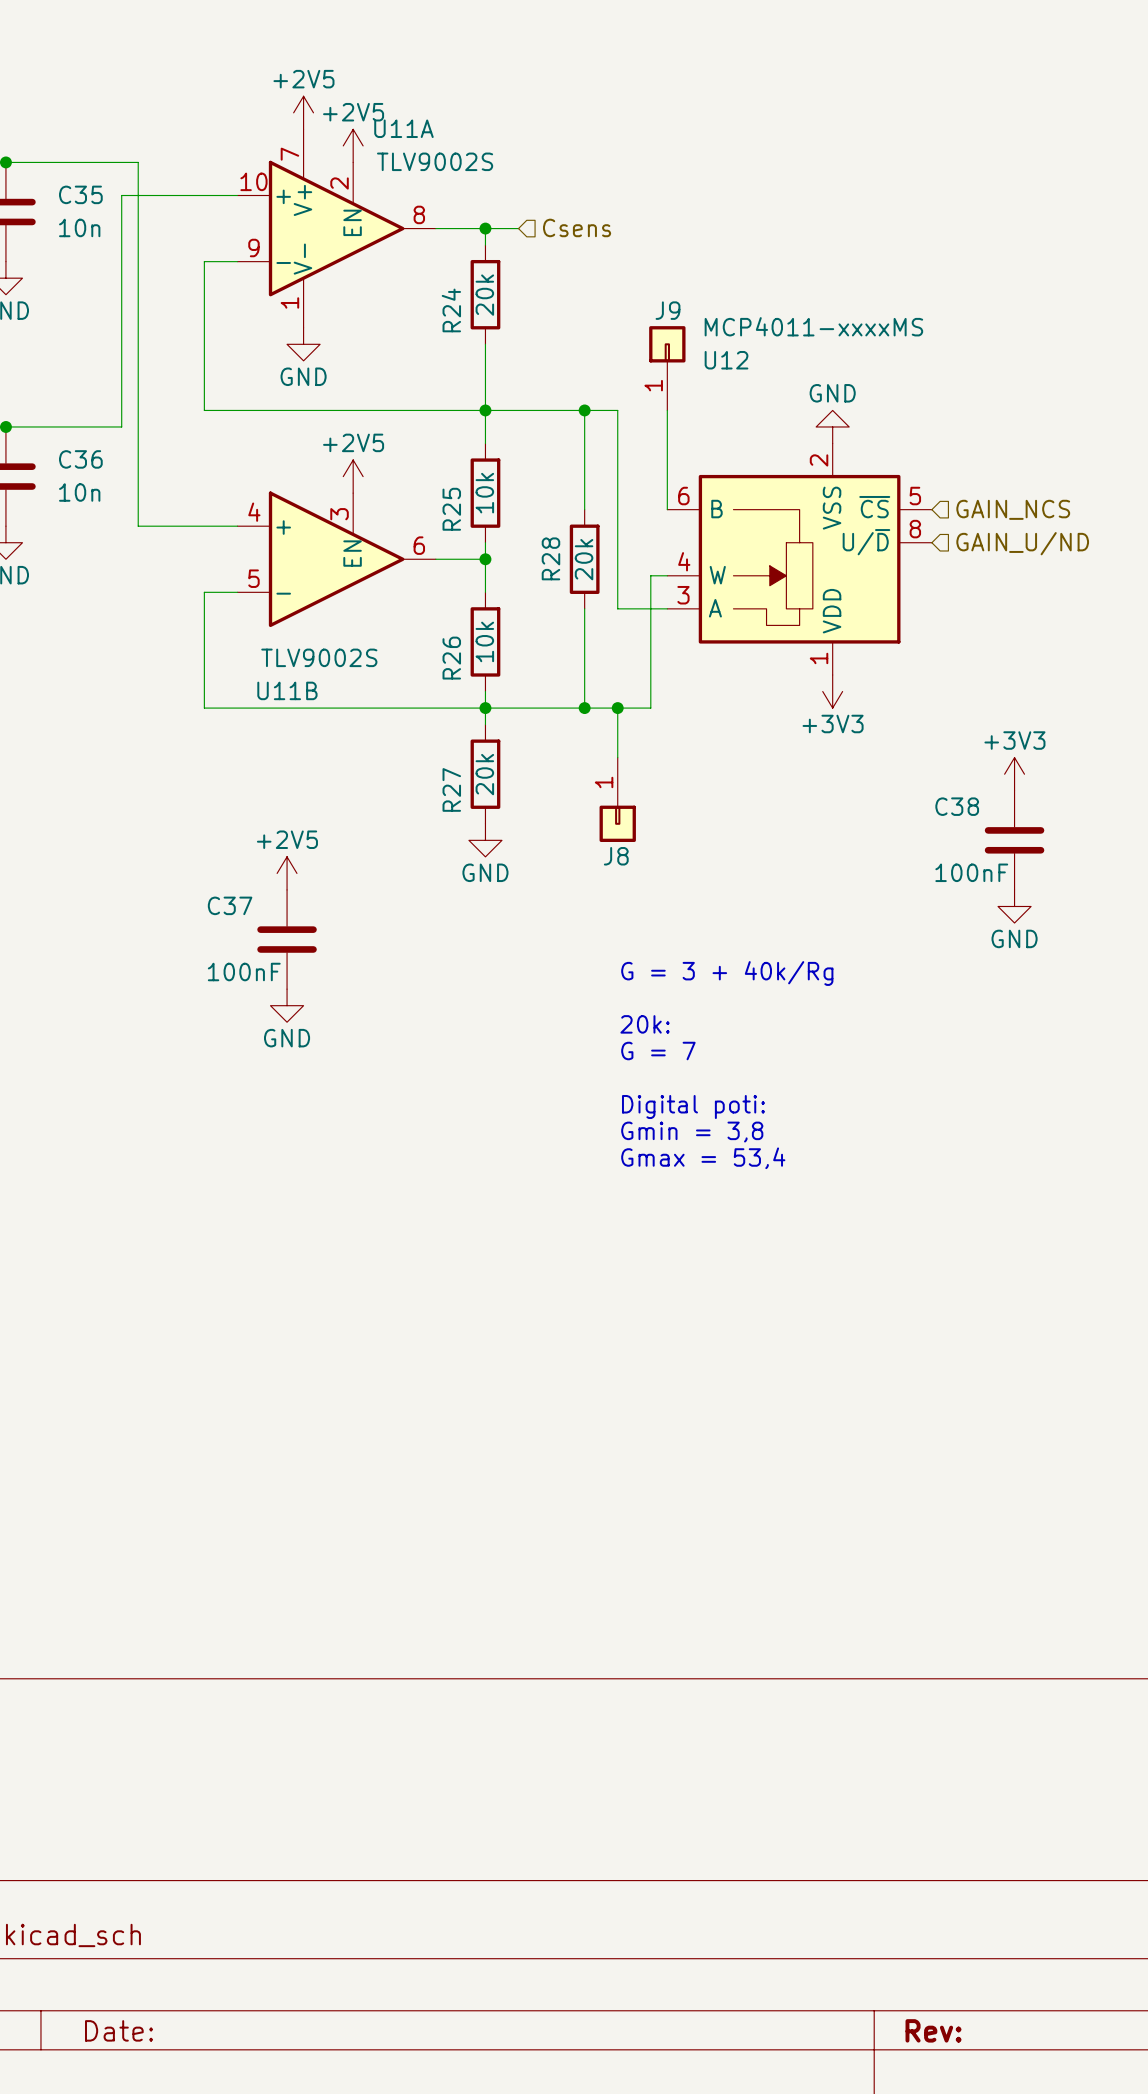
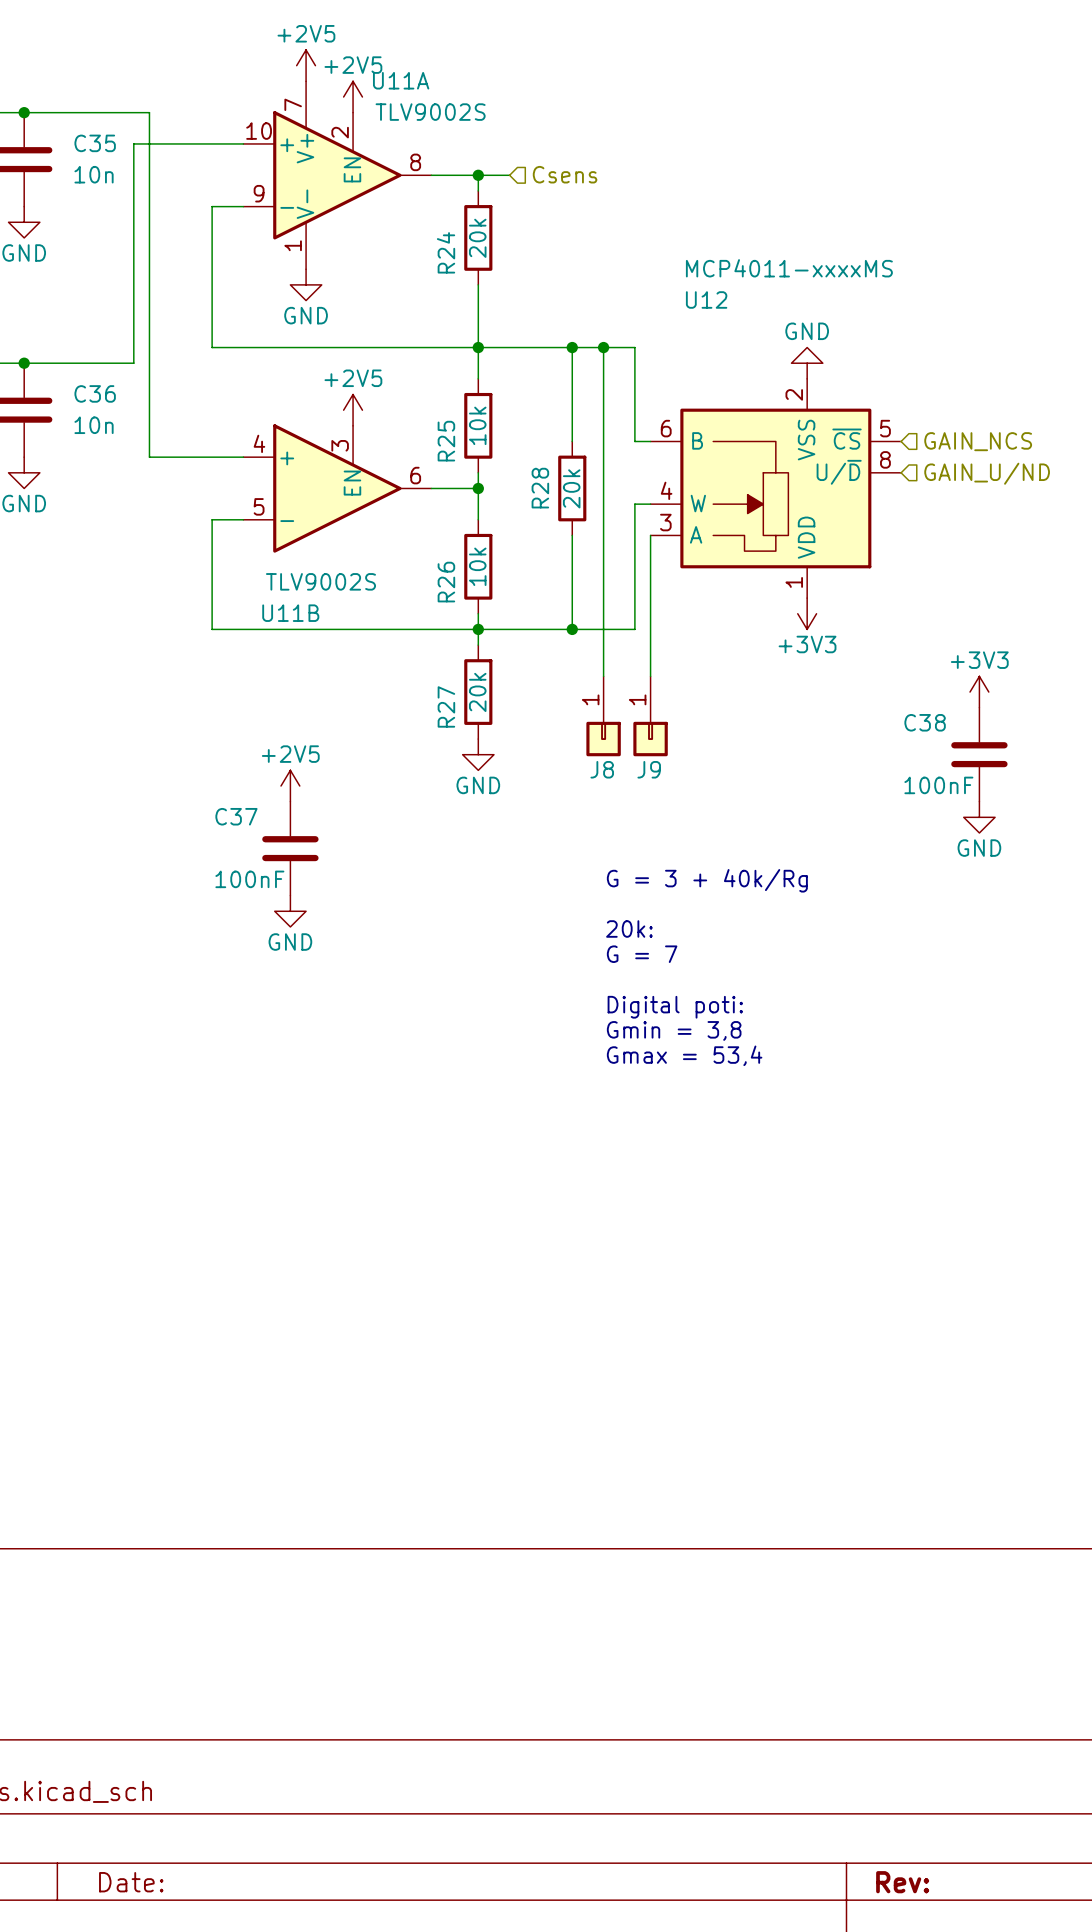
J9 rotation: 0° (667, 344) -> 180° (650, 739)
J9 position: (667, 368) -> (650, 716)
junction: none -> (603, 347)
wire: (667, 410) (667, 509) -> (603, 347) (634, 347) (634, 441) (650, 441)
wire: (617, 608) (667, 608) -> (603, 535) (603, 629)
wire: none -> (650, 535) (650, 676)
junction: (617, 708) -> none

